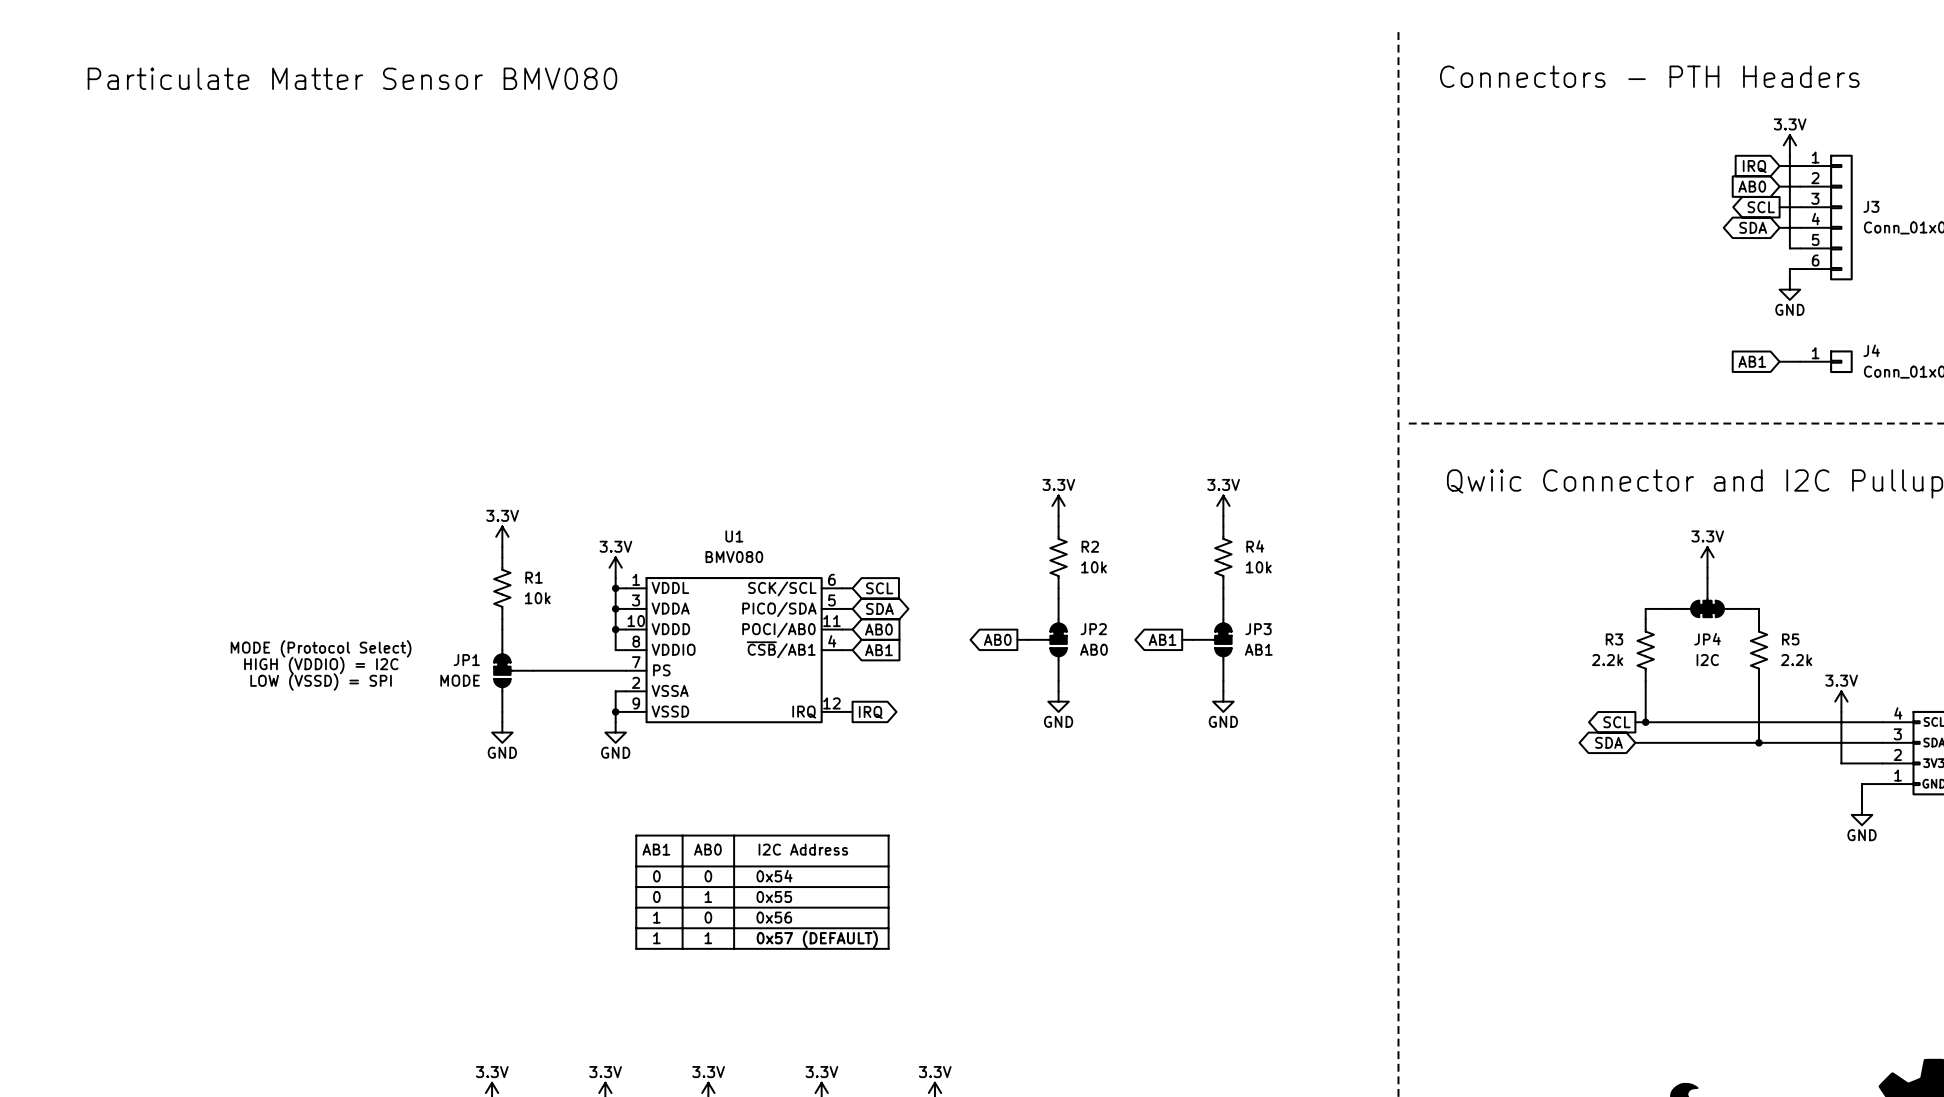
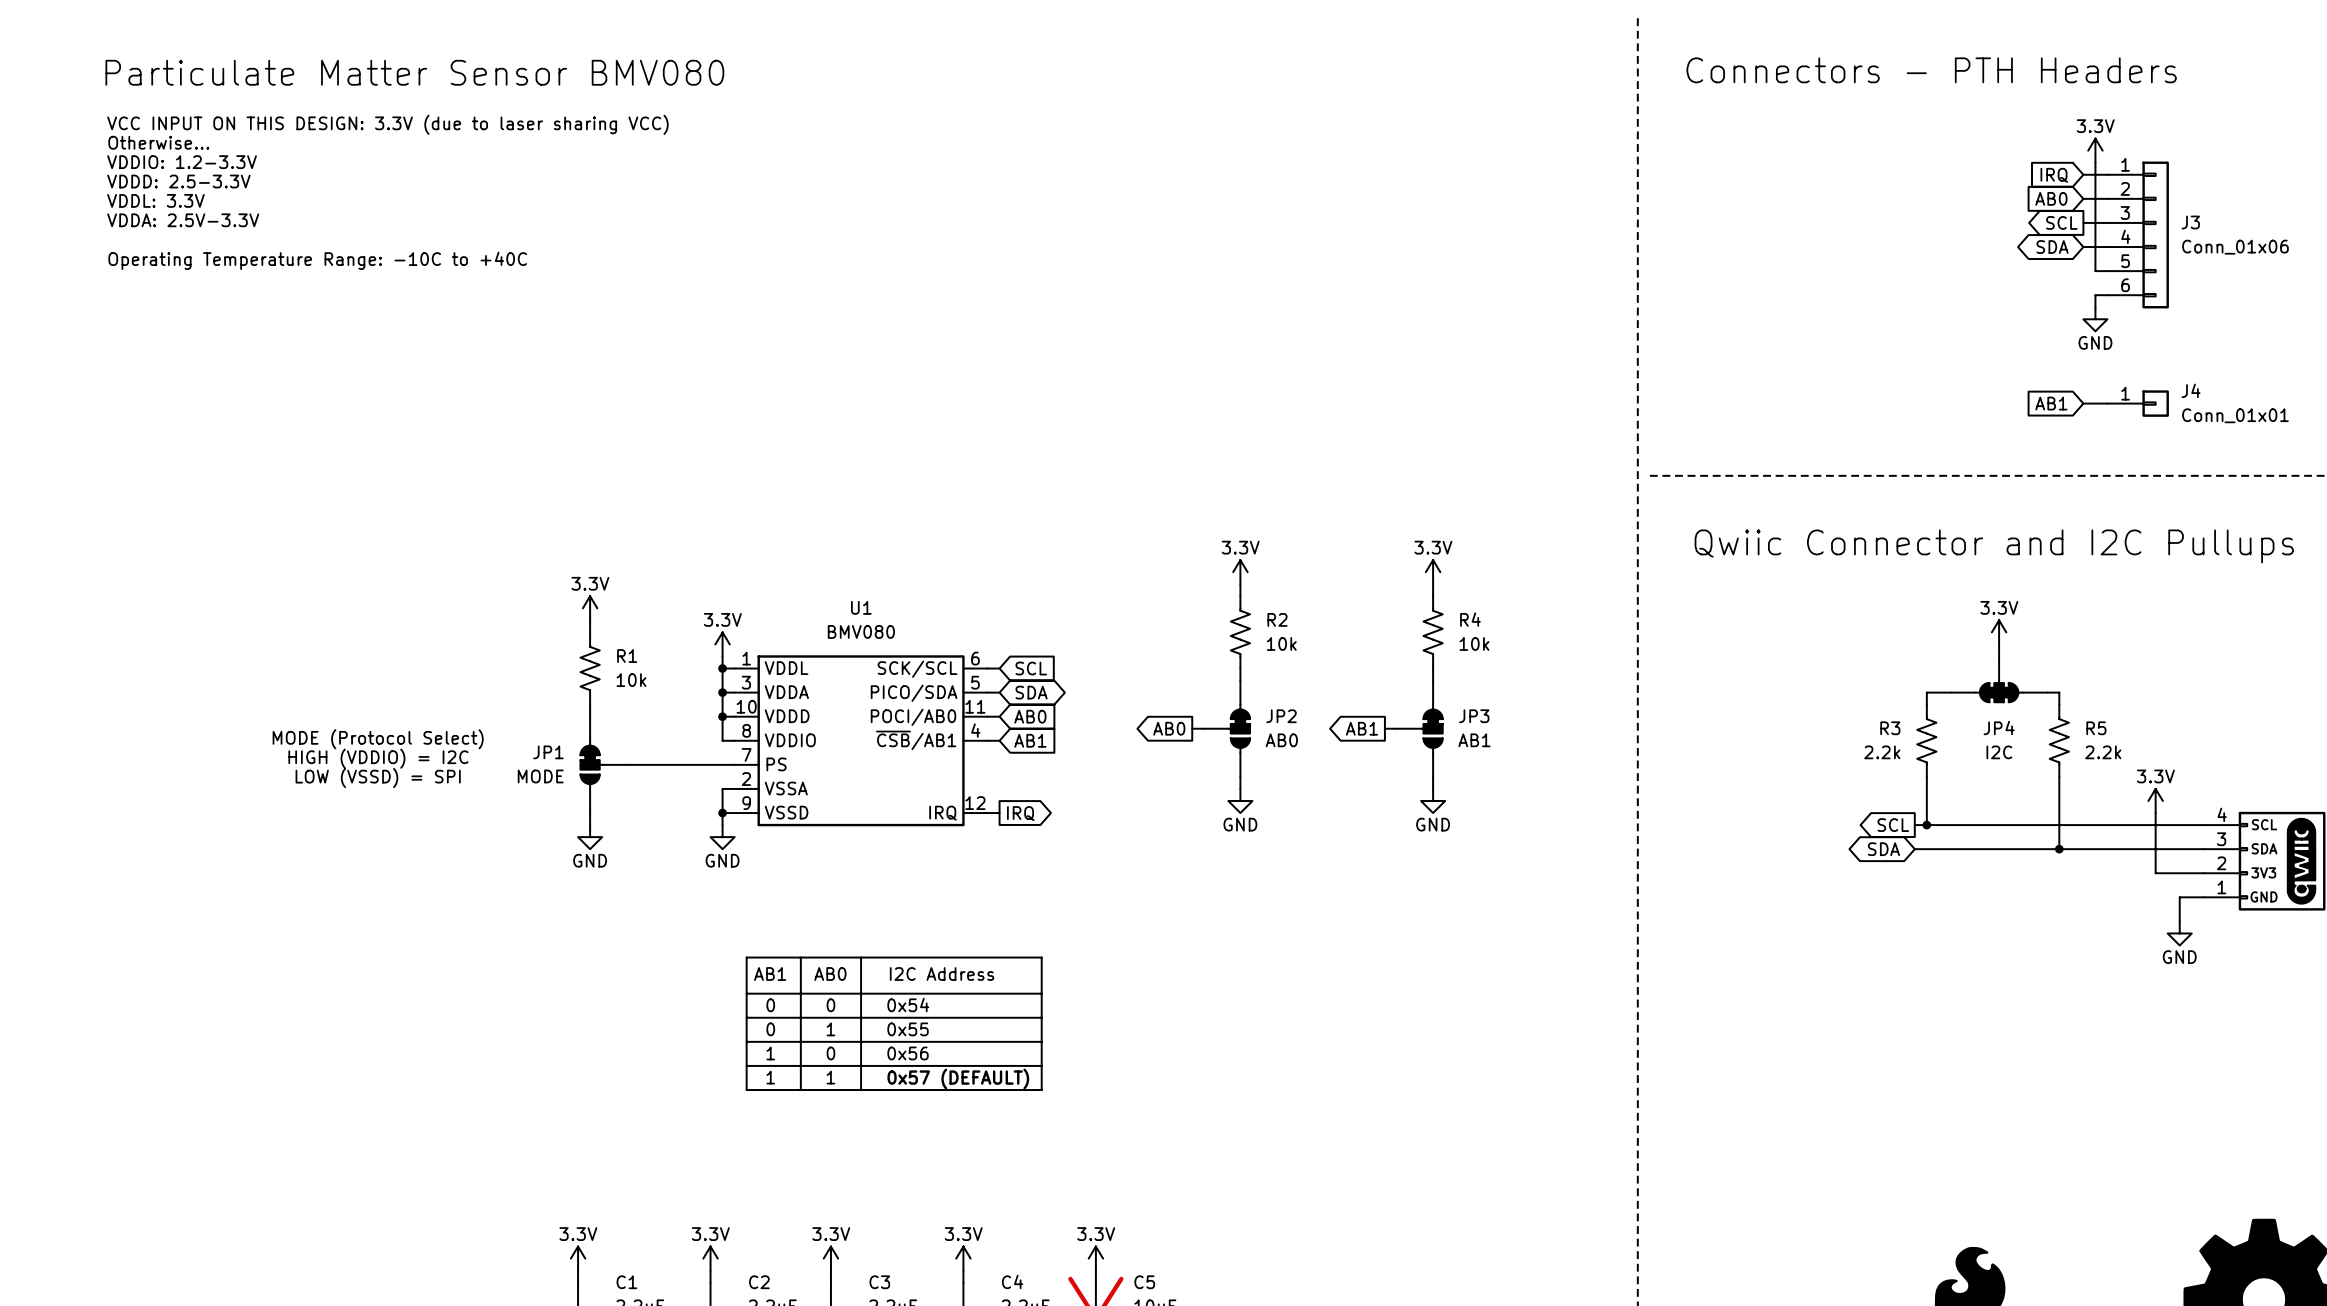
text: none -> VCC INPUT ON THIS DESIGN: 3.3V (due to laser sharing VCC) (387, 124)
text: none -> Otherwise... (158, 142)
text: none -> VDDIO: 1.2-3.3V (182, 162)
text: none -> VDDD: 2.5-3.3V (178, 181)
text: none -> VDDL: 3.3V (155, 200)
text: none -> VDDA: 2.5V-3.3V (183, 220)
text: none -> Operating Temperature Range: -10C to +40C (317, 260)

